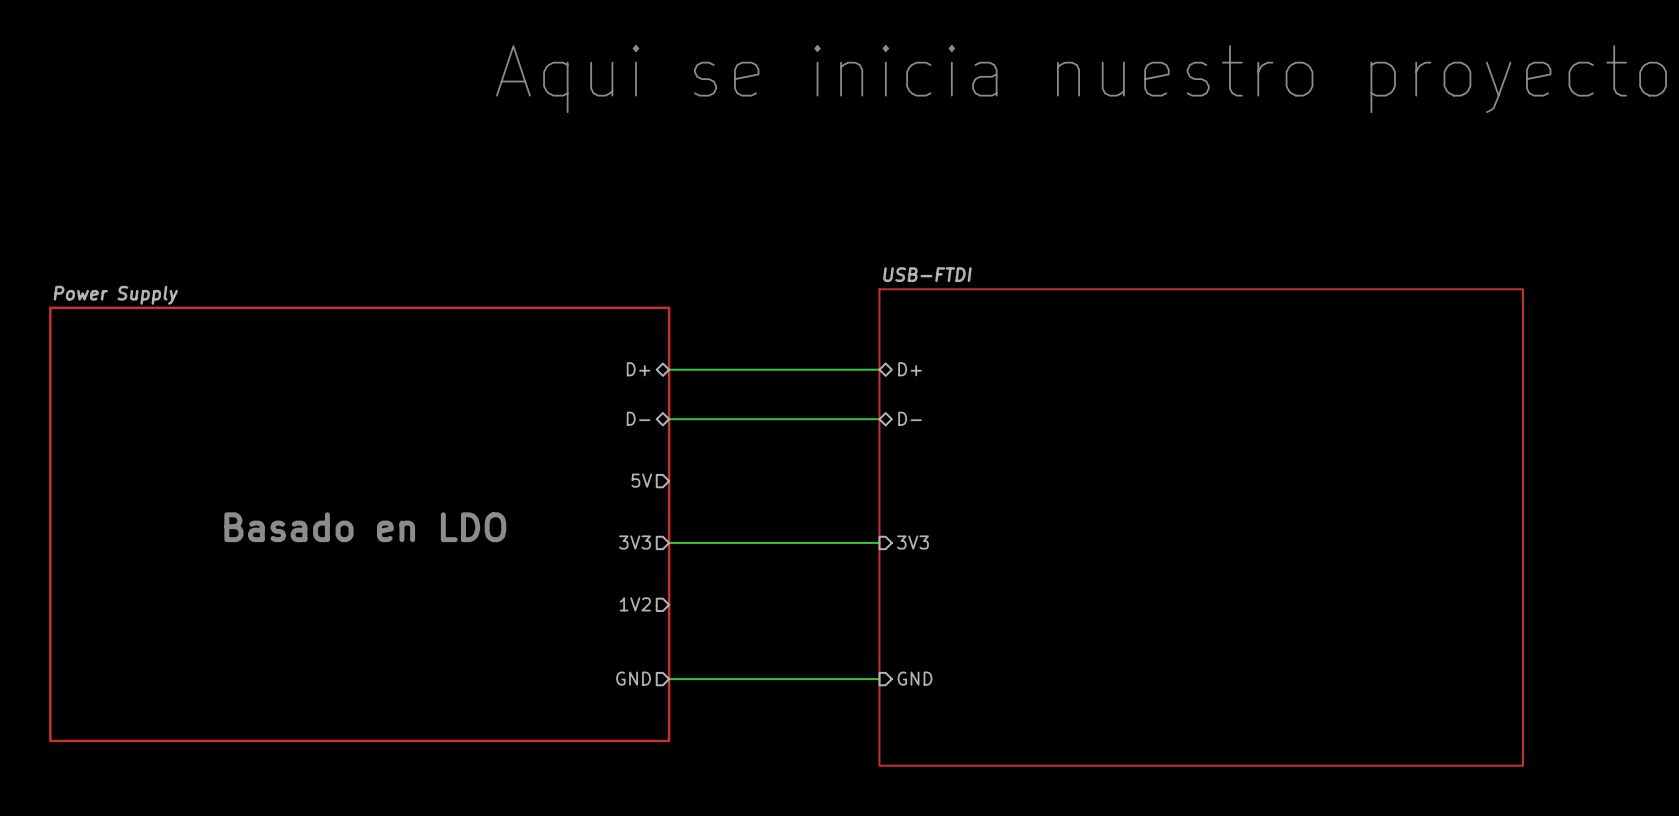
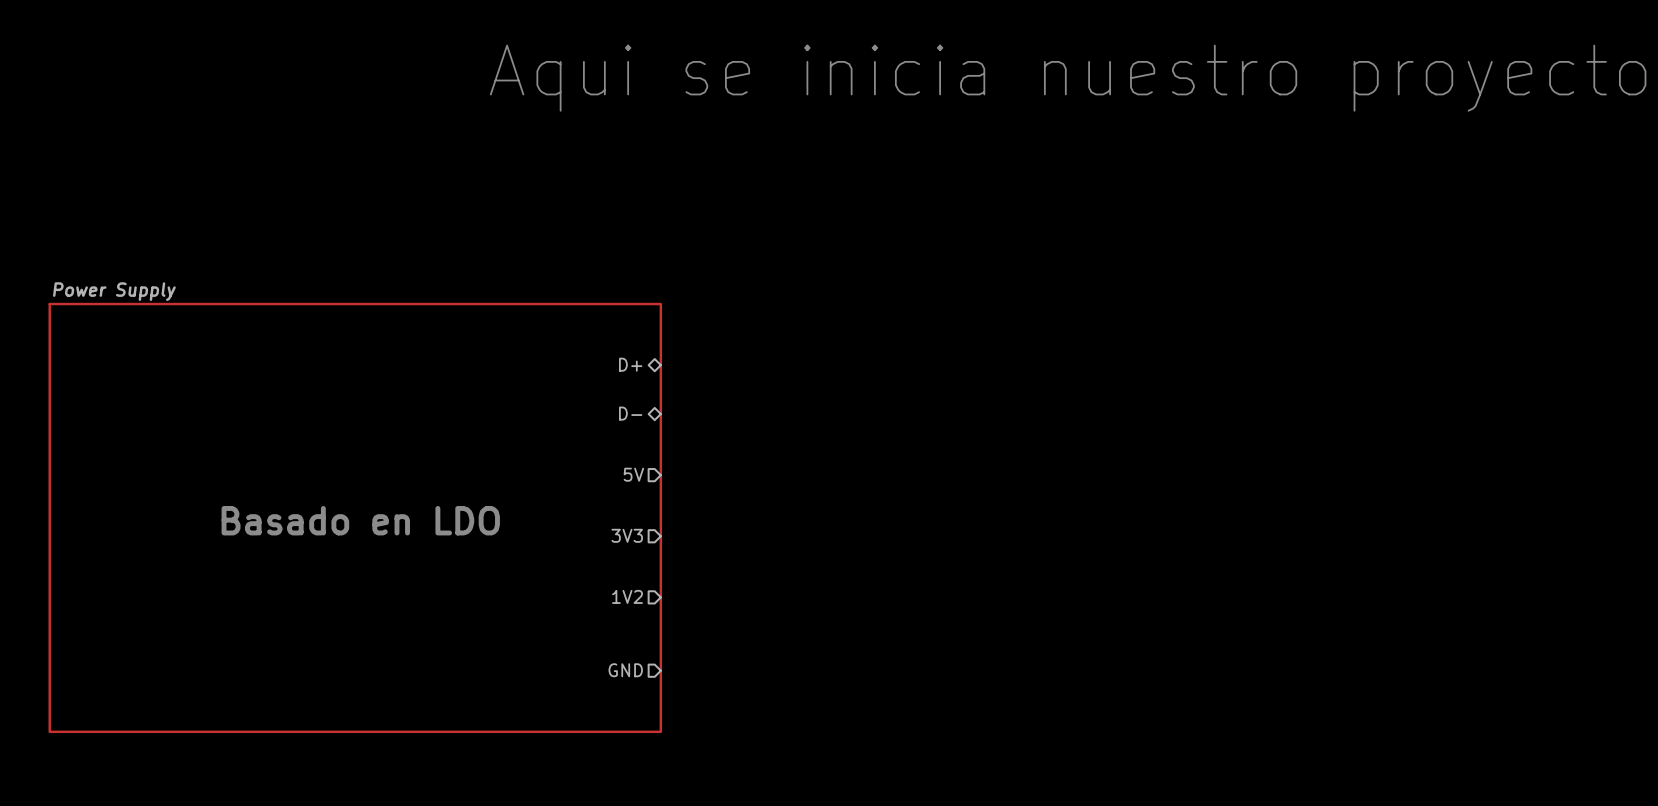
wire: (669, 369) (879, 369) -> none
sheet pin: D+ (910, 369) -> none
sheet pin: D- (910, 418) -> none
wire: (669, 419) (879, 419) -> none
sheet USB-FTDI: (1201, 527) -> none
wire: (669, 542) (879, 542) -> none
sheet pin: 3V3 (912, 542) -> none
sheet pin: GND (915, 678) -> none
wire: (669, 679) (879, 679) -> none

